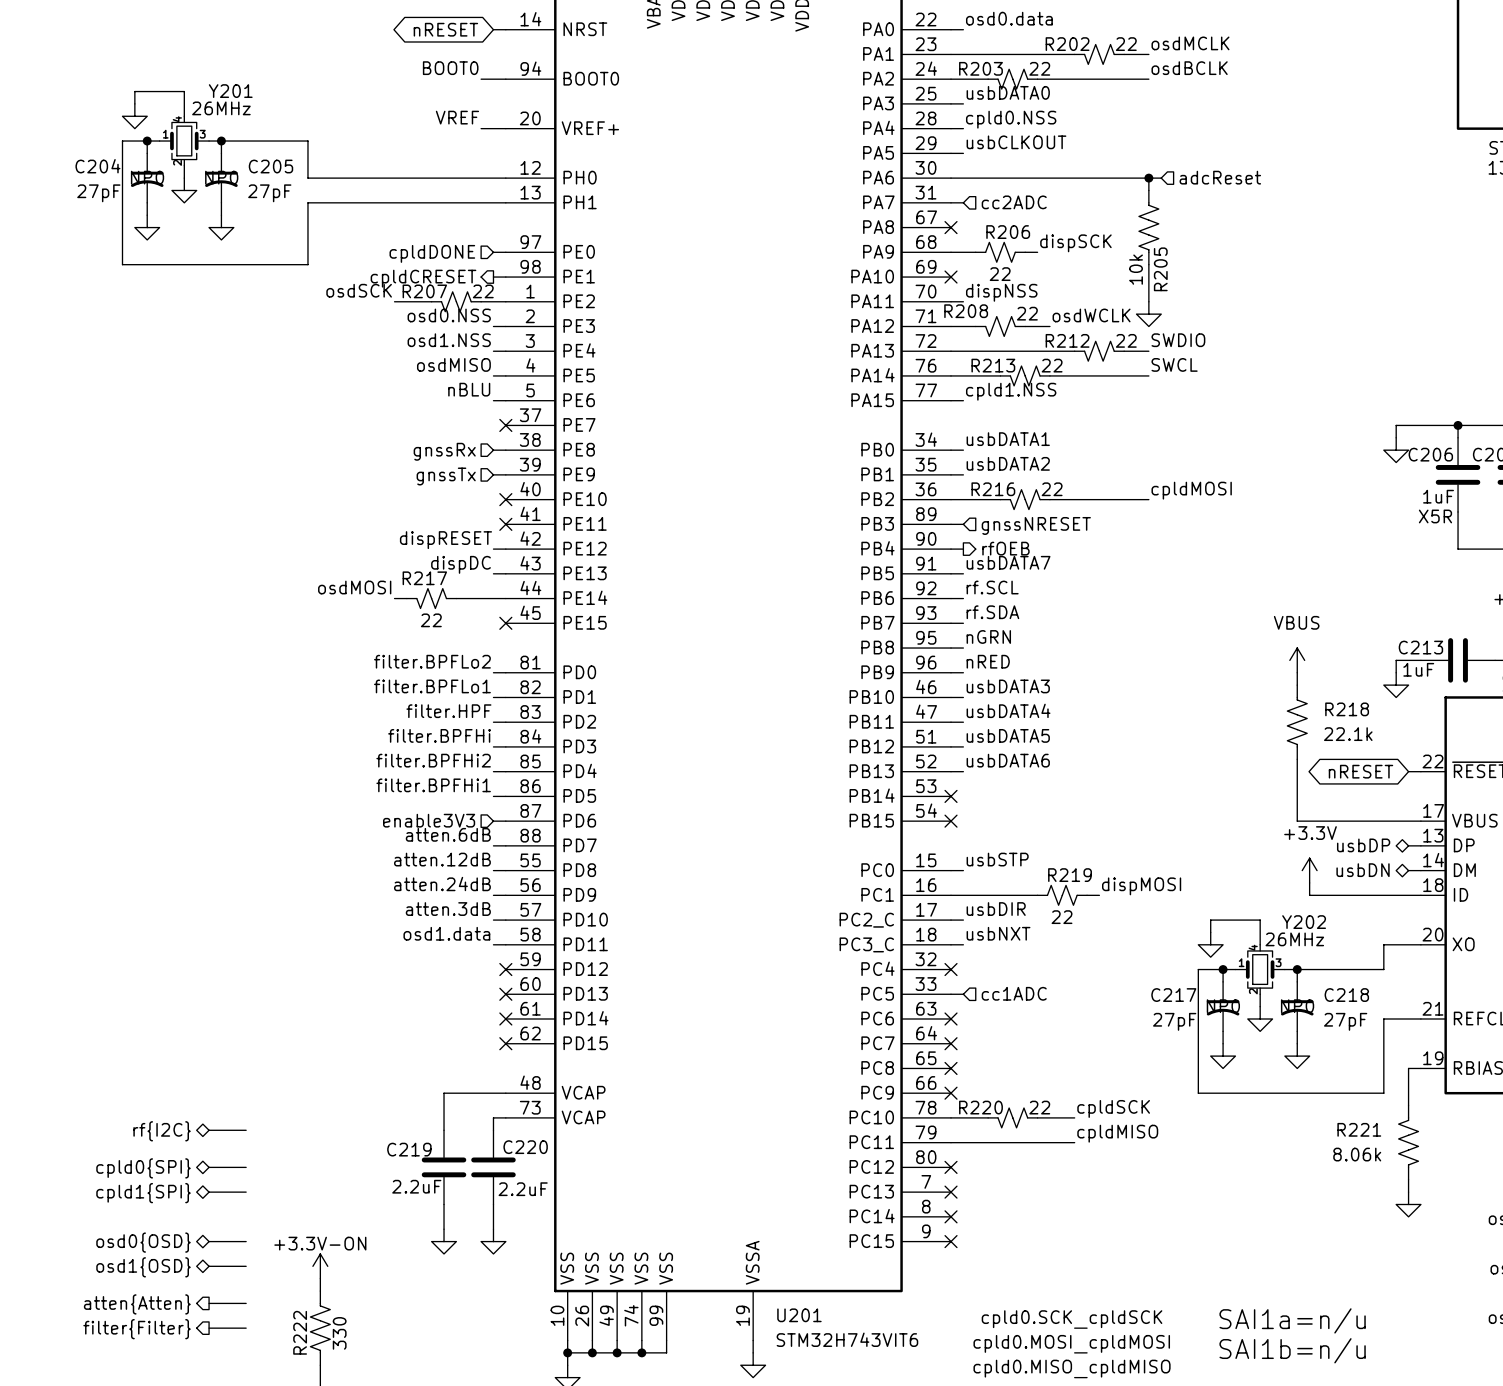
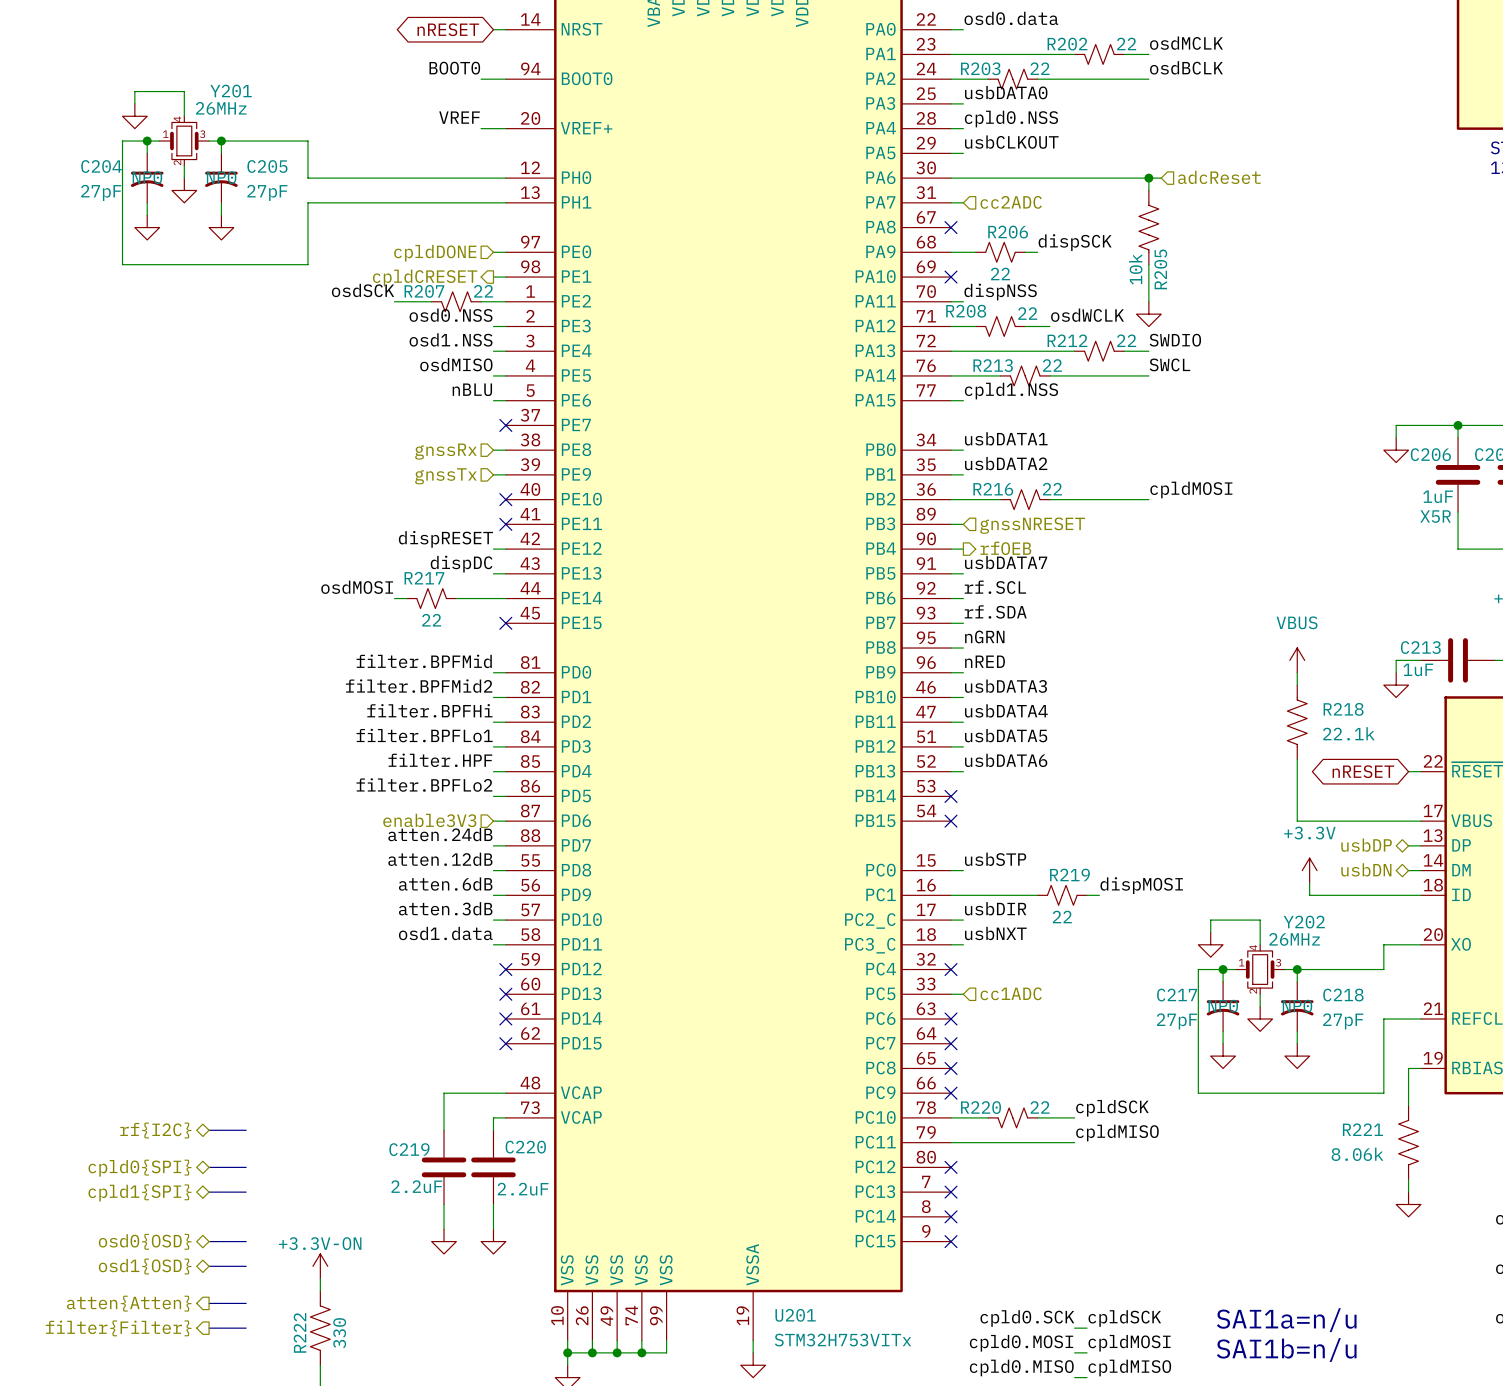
label: filter.BPFLo2 (432, 661) -> filter.BPFMid (424, 661)
label: filter.BPFLo1 (432, 686) -> filter.BPFMid2 (419, 686)
label: filter.HPF (448, 711) -> filter.BPFHi (429, 710)
label: filter.BPFHi (439, 735) -> filter.BPFLo1 (424, 735)
label: filter.BPFHi2 (433, 760) -> filter.HPF (440, 760)
label: filter.BPFHi1 (433, 785) -> filter.BPFLo2 (424, 785)
label: atten.6dB (448, 834) -> atten.24dB (440, 834)
label: atten.24dB (442, 884) -> atten.6dB (445, 884)
U201 value: STM32H743VIT6 (847, 1339) -> STM32H753VITx (842, 1340)

